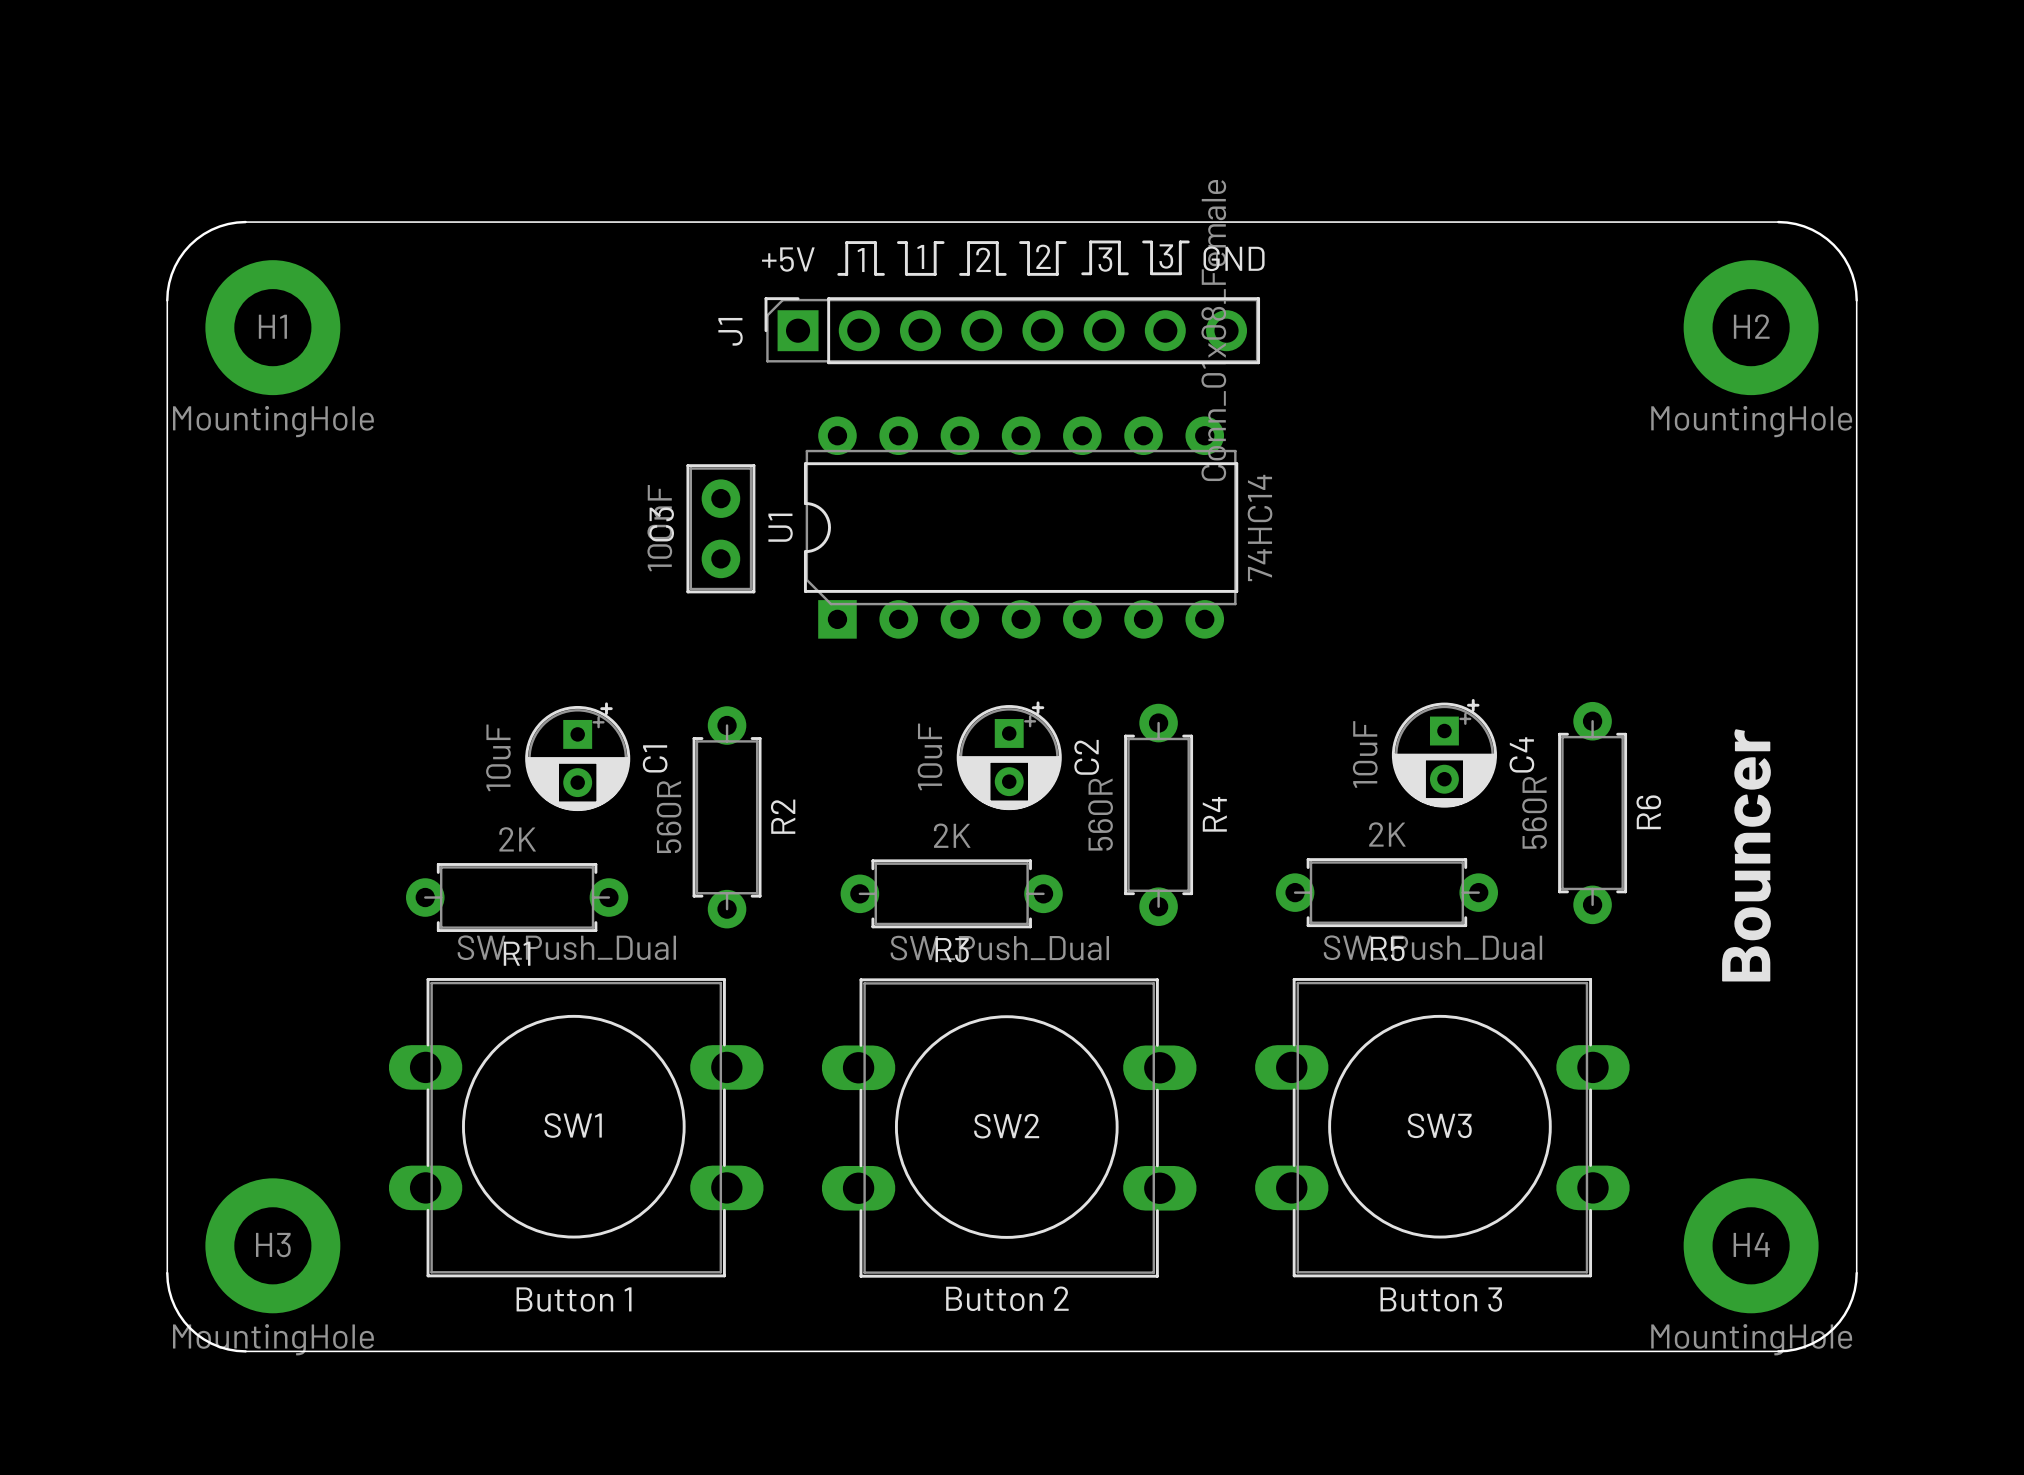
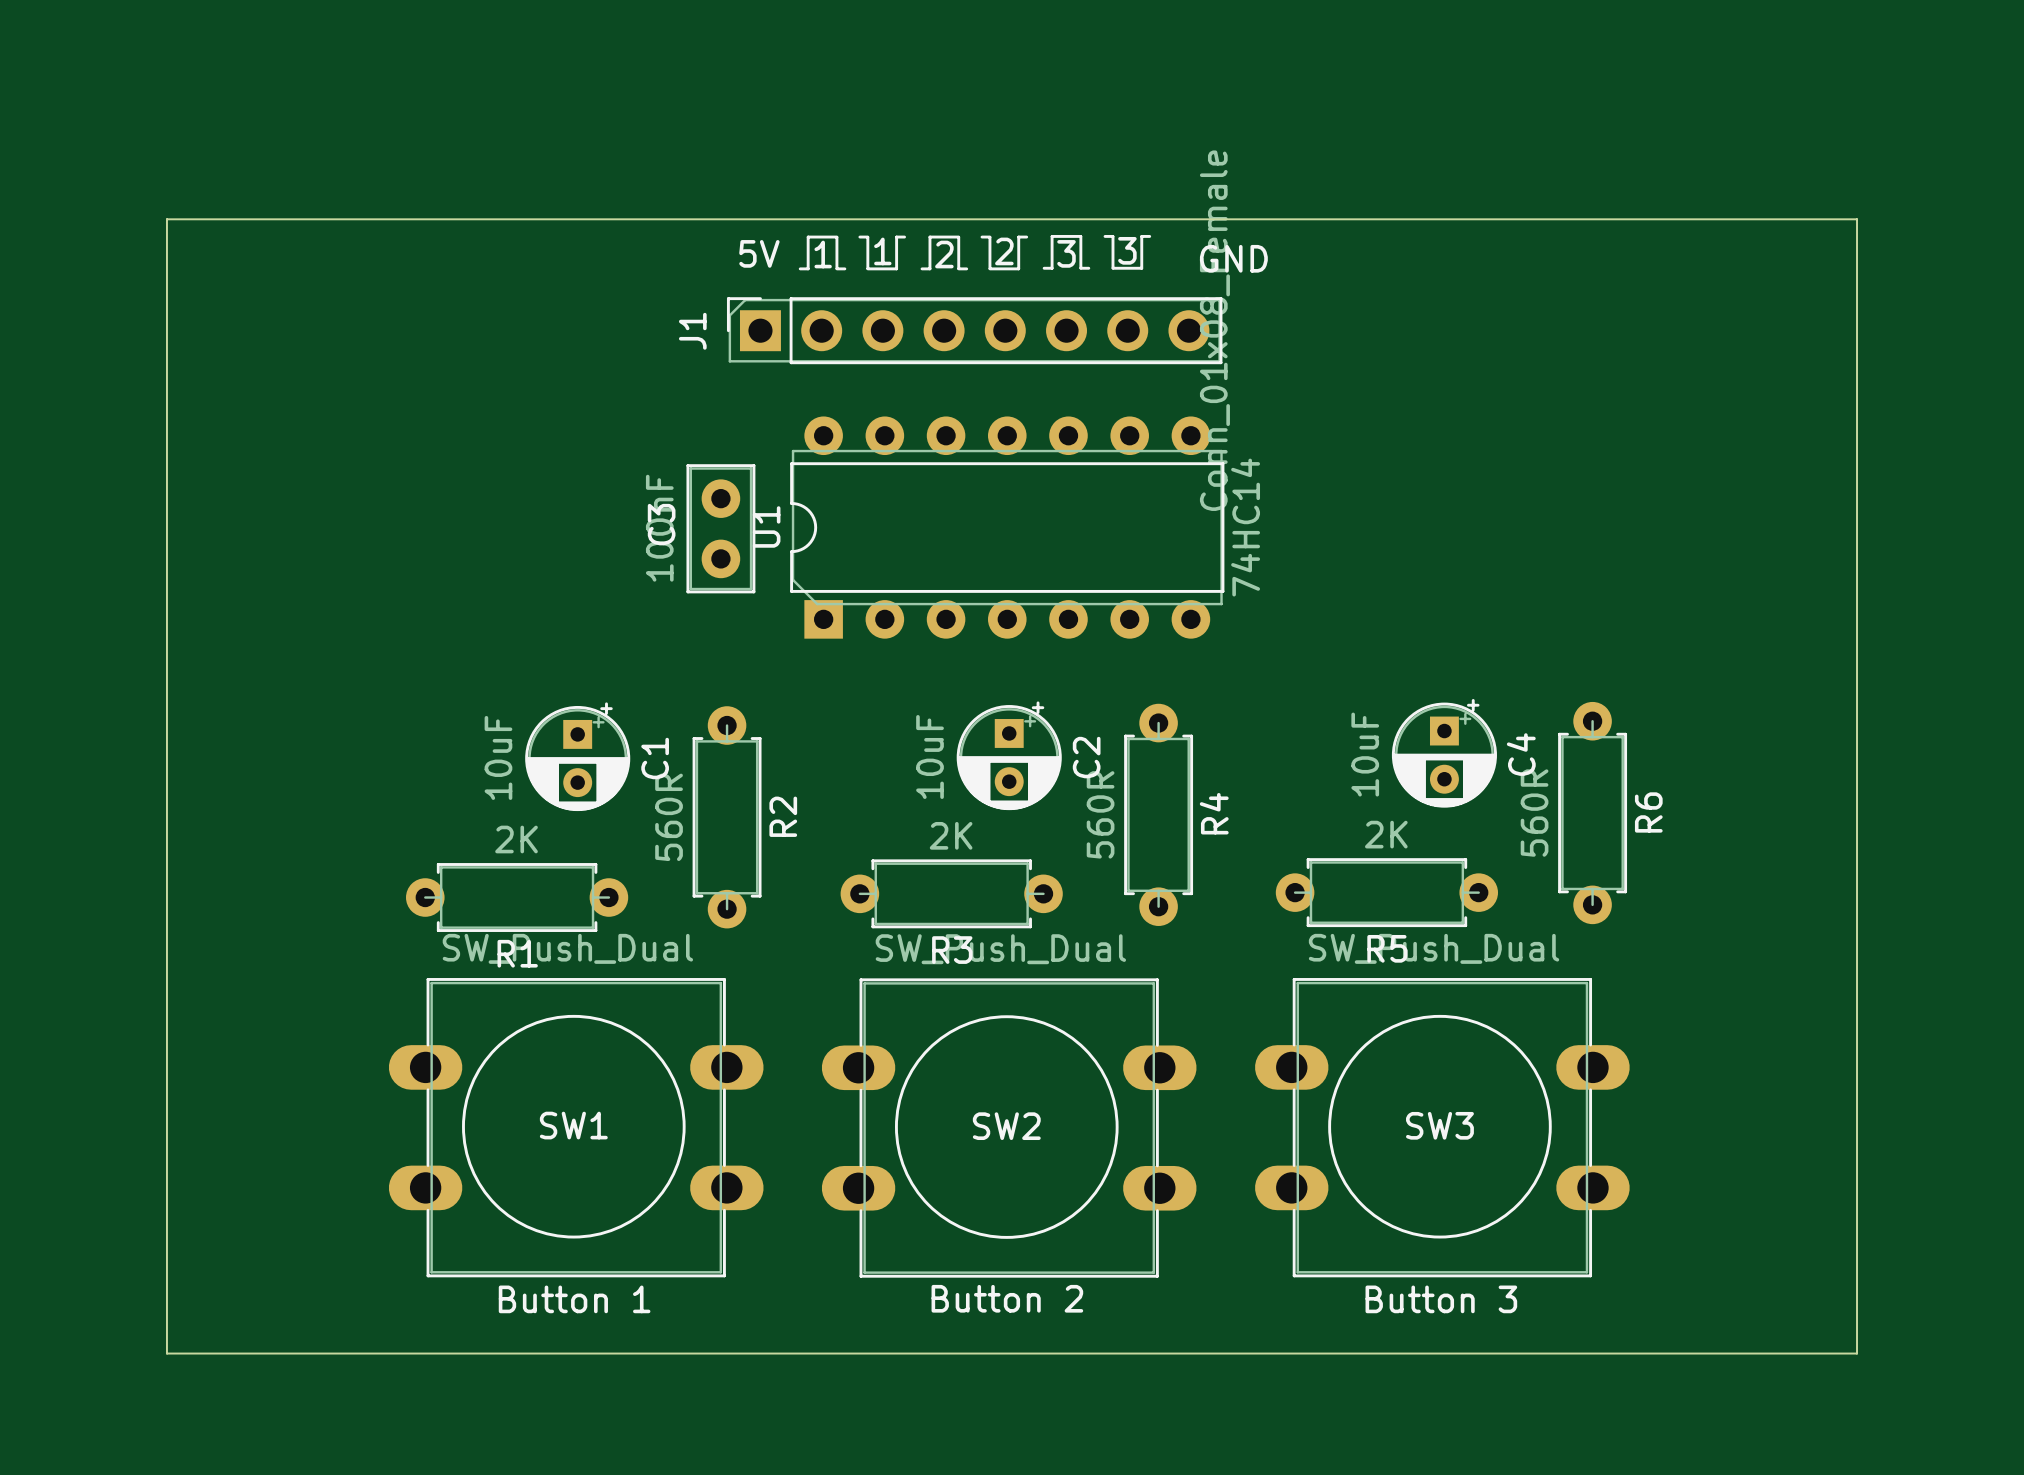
board edge: (245, 222) (1778, 222) (1804, 226) (1820, 234) (1833, 245) (1848, 266) (1854, 282) (1856, 300) (1856, 1273) (1854, 1290) (1844, 1314) (1833, 1328) (1820, 1339) (1804, 1346) (1778, 1351) (245, 1351) (228, 1349) (203, 1339) (190, 1328) (175, 1307) (169, 1290) (167, 1273) (167, 300) (169, 282) (175, 266) (190, 245) (211, 229) (228, 224) (245, 222) -> (166, 219) (166, 1353) (1857, 1353) (1857, 219) (166, 219)
line: (1119, 241) (1090, 241) (1090, 273) (1082, 273) -> (1080, 236) (1052, 236) (1052, 268) (1044, 268)
line: (1143, 241) (1151, 241) -> (1105, 236) (1112, 236)
line: (1188, 241) (1180, 241) (1180, 273) (1151, 273) -> (1149, 236) (1141, 236) (1141, 268) (1112, 268)
line: (875, 242) (846, 242) (846, 274) (838, 274) -> (836, 237) (808, 237) (808, 268) (800, 268)
line: (875, 242) (875, 274) -> (836, 237) (836, 268)
line: (898, 242) (906, 242) -> (859, 237) (867, 237)
line: (906, 242) (906, 274) -> (867, 237) (867, 268)
line: (943, 242) (935, 242) (935, 274) (906, 274) -> (904, 237) (896, 237) (896, 268) (867, 268)
line: (997, 242) (997, 274) -> (958, 237) (958, 268)
line: (997, 242) (968, 242) (968, 274) (960, 274) -> (958, 237) (929, 237) (929, 268) (922, 268)
line: (1020, 242) (1028, 242) -> (981, 237) (989, 237)
line: (1028, 242) (1028, 274) -> (989, 237) (989, 268)
line: (1065, 242) (1057, 242) (1057, 274) (1028, 274) -> (1026, 237) (1018, 237) (1018, 268) (989, 268)
line: (1119, 242) (1119, 273) -> (1080, 236) (1080, 267)
line: (1151, 242) (1151, 273) -> (1112, 236) (1112, 267)
text: none -> 1 (823, 254)
text: none -> 2 (944, 254)
text: none -> 3 (1066, 253)
text: 1 (920, 256) -> none
text: 2 (1043, 256) -> none
text: 3 (1166, 256) -> none
text: +5V (788, 259) -> 5V (759, 253)
text position: 2 (983, 259) -> 2 (1004, 251)
text position: 3 (1105, 259) -> 3 (1127, 250)
text position: 1 (861, 260) -> 1 (882, 251)
line: (1119, 273) (1127, 273) -> (1080, 268) (1088, 268)
line: (875, 274) (883, 274) -> (836, 268) (844, 268)
line: (997, 274) (1005, 274) -> (958, 268) (966, 268)
H1: MountingHole (272, 327) -> none
H2: MountingHole (1751, 327) -> none
J1 position: (1012, 330) -> (974, 330)
U1 position: (1021, 527) -> (1007, 527)
text: Bouncer (1746, 855) -> none
H3: MountingHole (272, 1245) -> none
H4: MountingHole (1751, 1245) -> none

